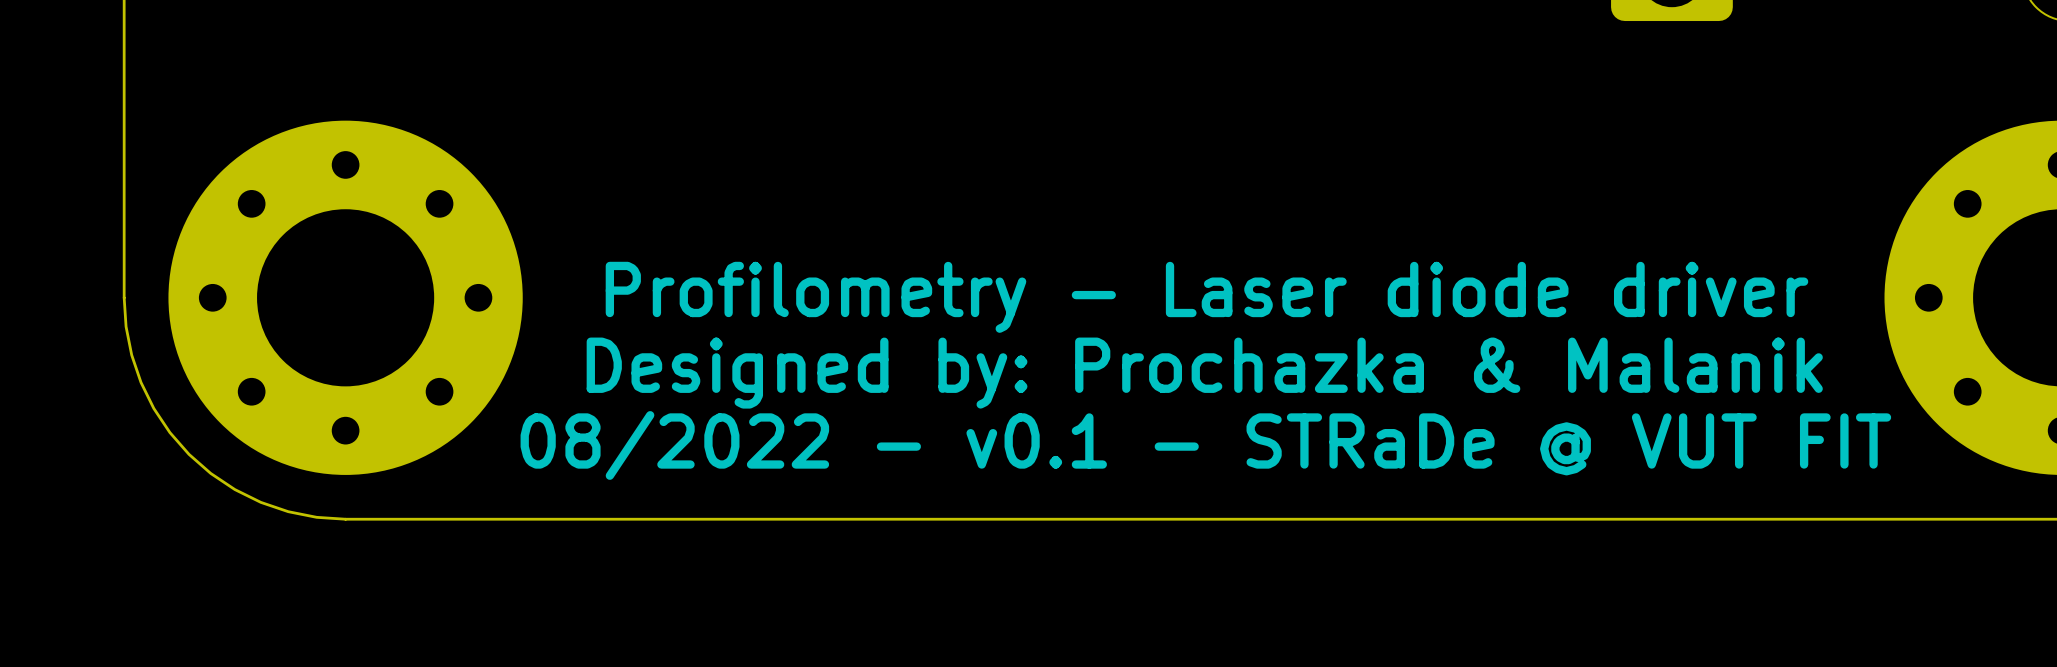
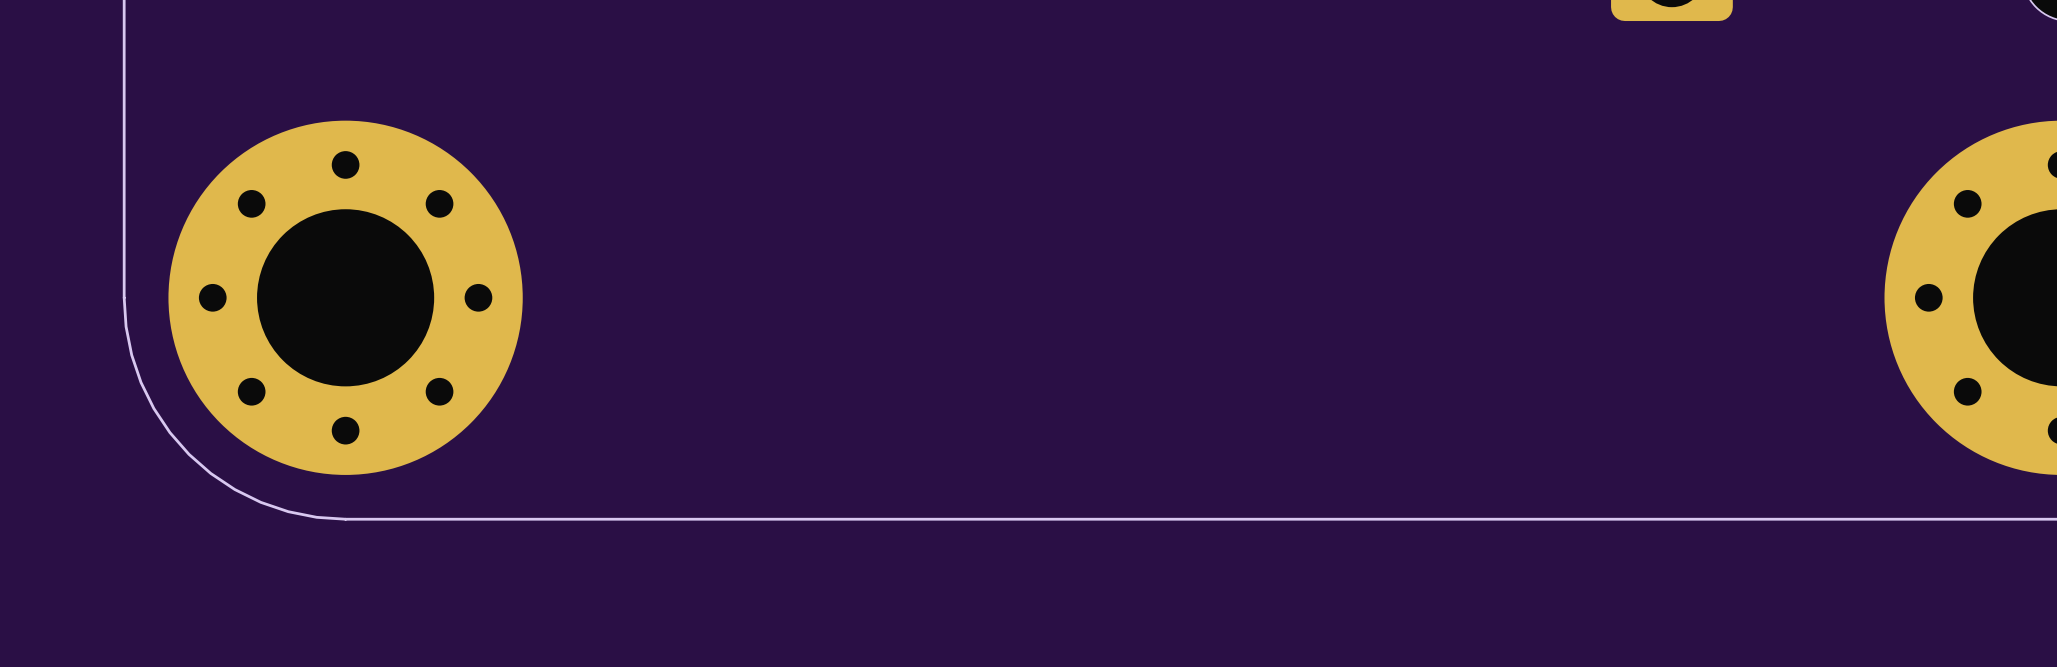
text: Profilometry - Laser diode driver (1206, 297) -> none
text: Designed by: Prochazka & Malanik (1204, 373) -> none
text: 08/2022 - v0.1 - STRaDe @ VUT FIT (1205, 445) -> none

